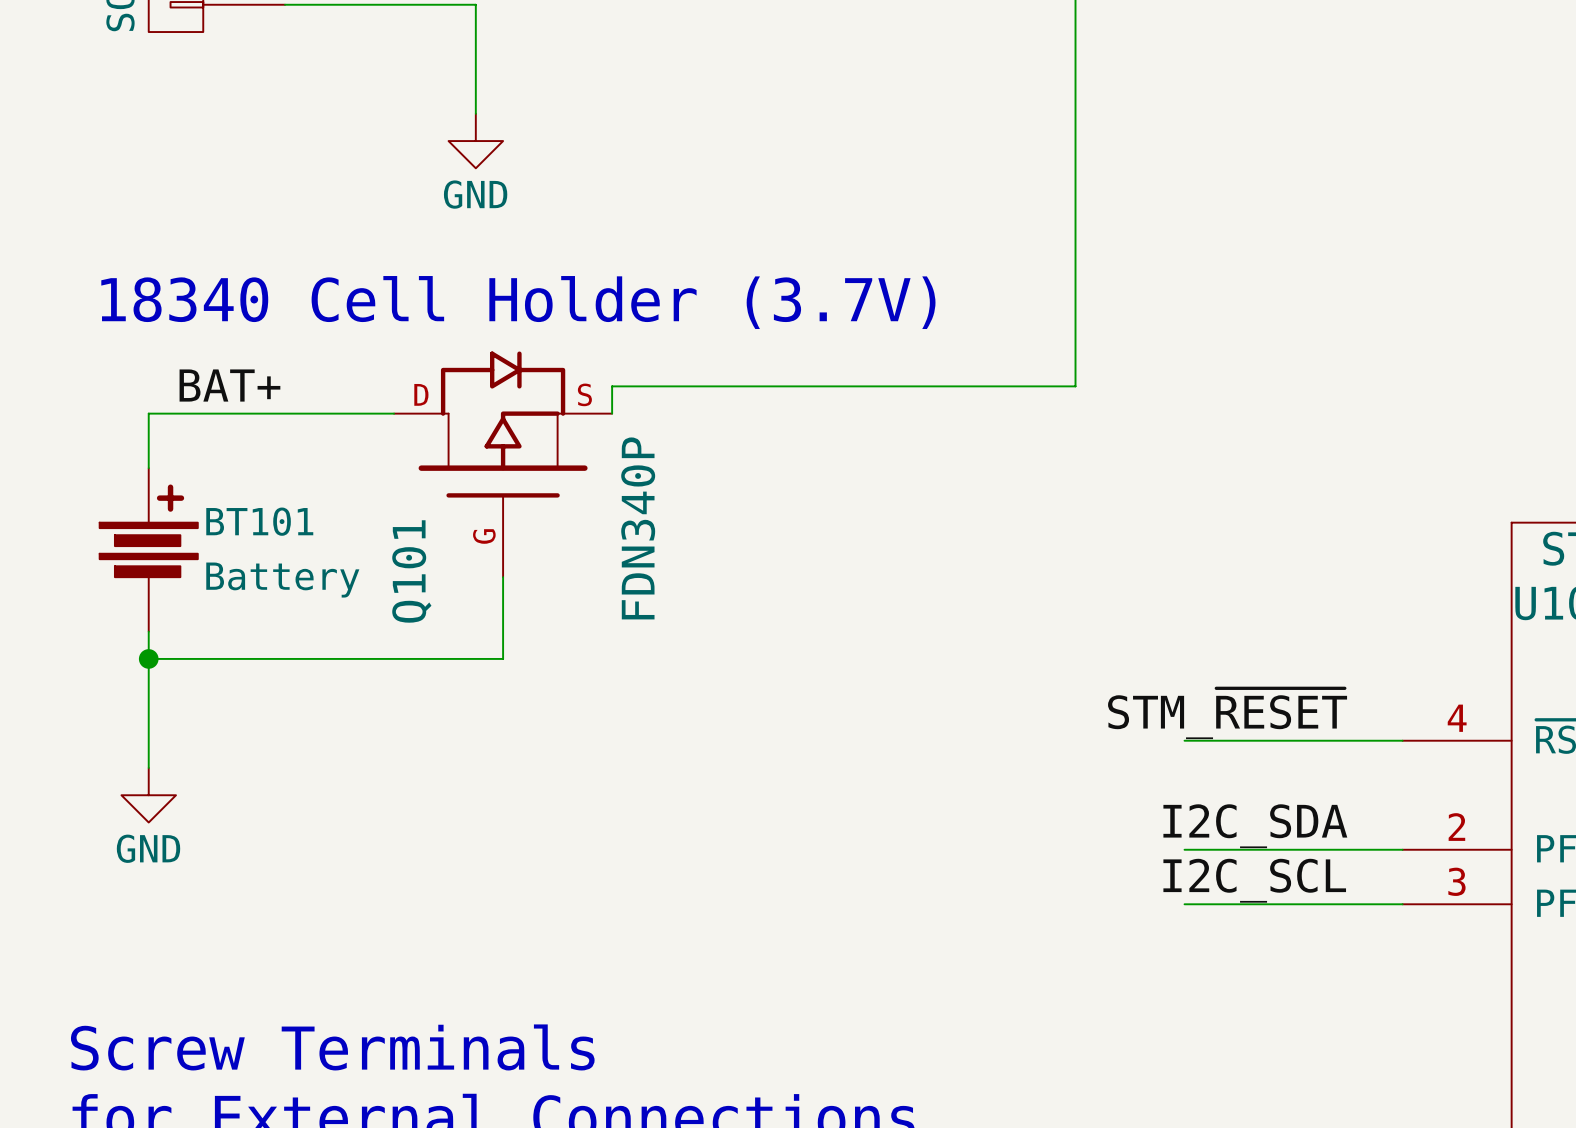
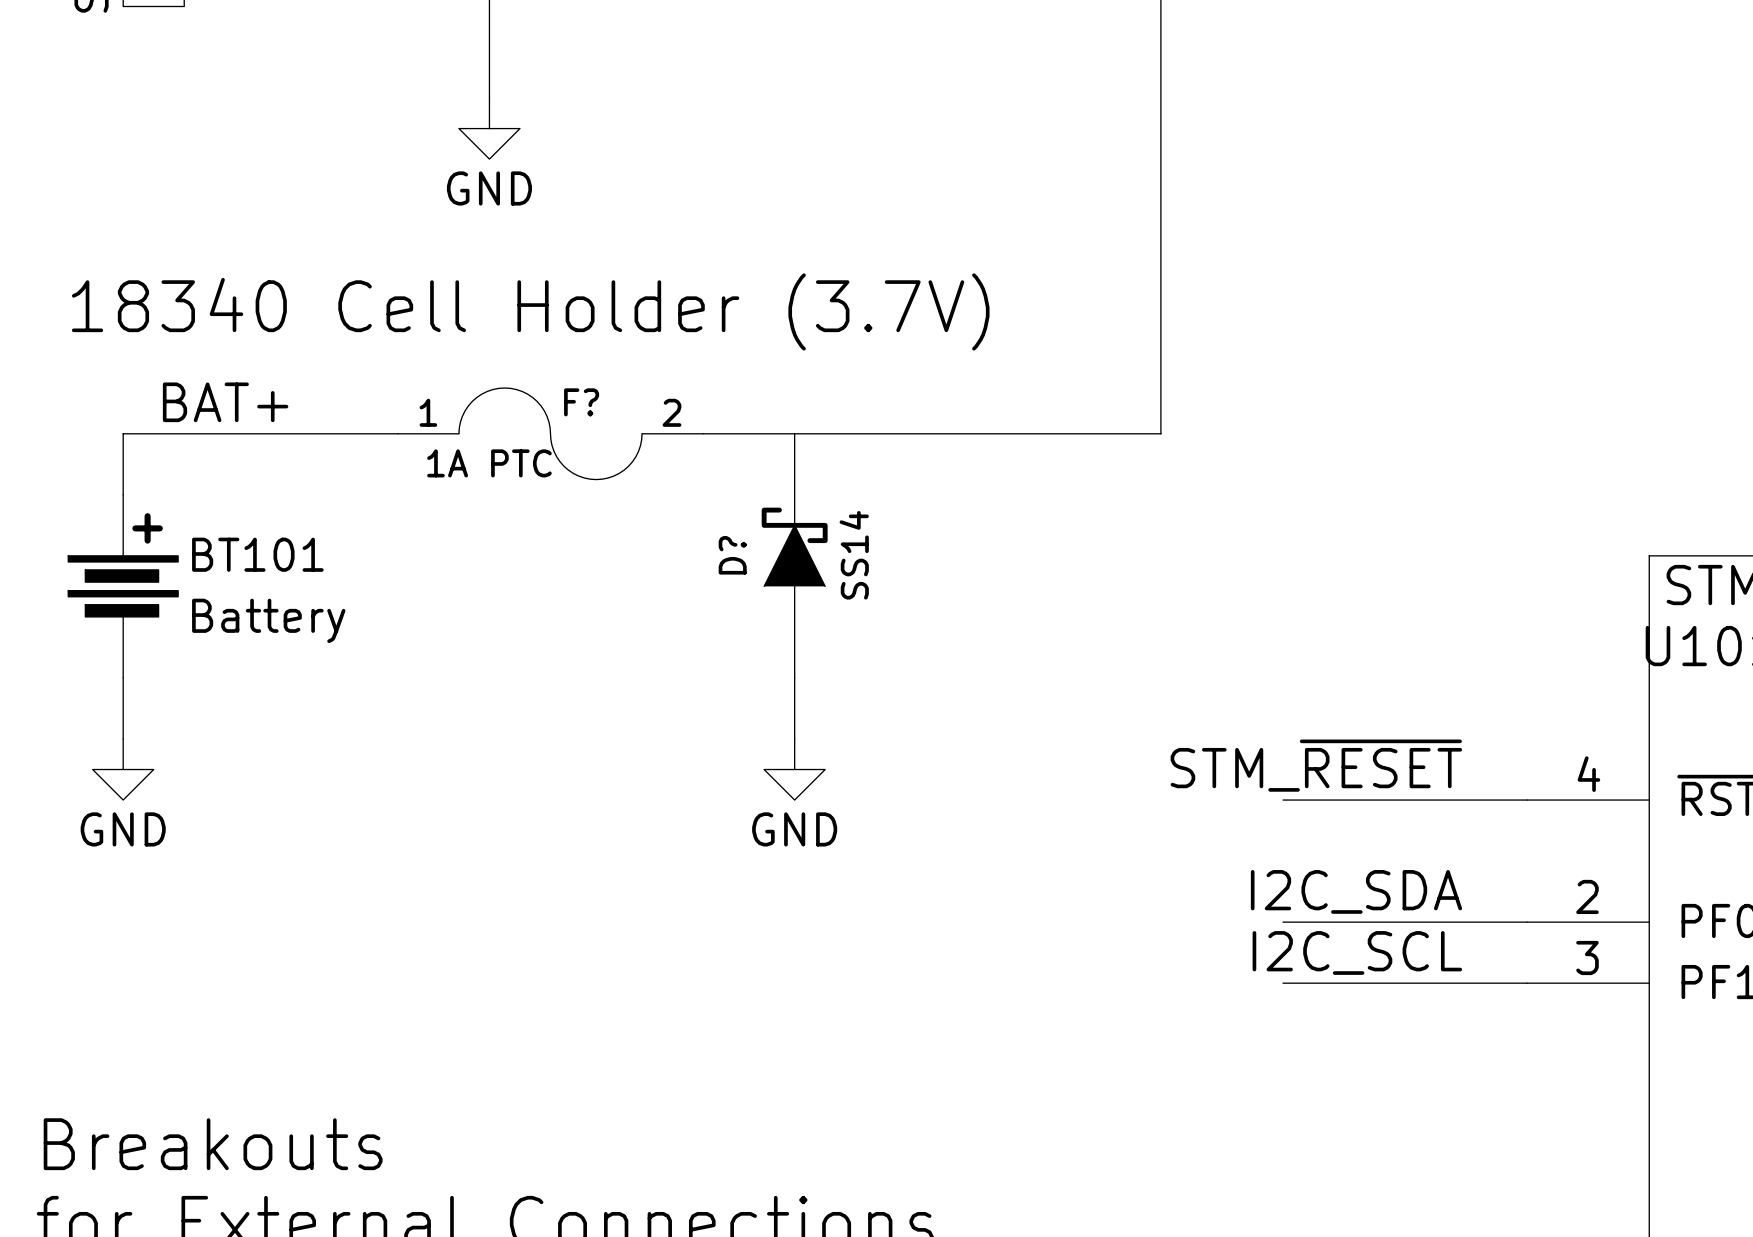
wire: (1075, 386) (612, 386) (612, 413) -> (1160, 403) (1160, 433) (703, 433)
F?: none -> 1A PTC (550, 433)
Q101: FDN340P (503, 464) -> none
D?: none -> SS14 (794, 555)
wire: (503, 577) (503, 658) (148, 658) -> none
wire: none -> (794, 677) (794, 739)
junction: (148, 658) -> none
wire: (148, 686) (148, 767) -> none
power symbol: none -> GND (794, 769)
power symbol position: GND (148, 795) -> GND (123, 769)
text: Screw Terminals (332, 1047) -> Breakouts (213, 1144)

